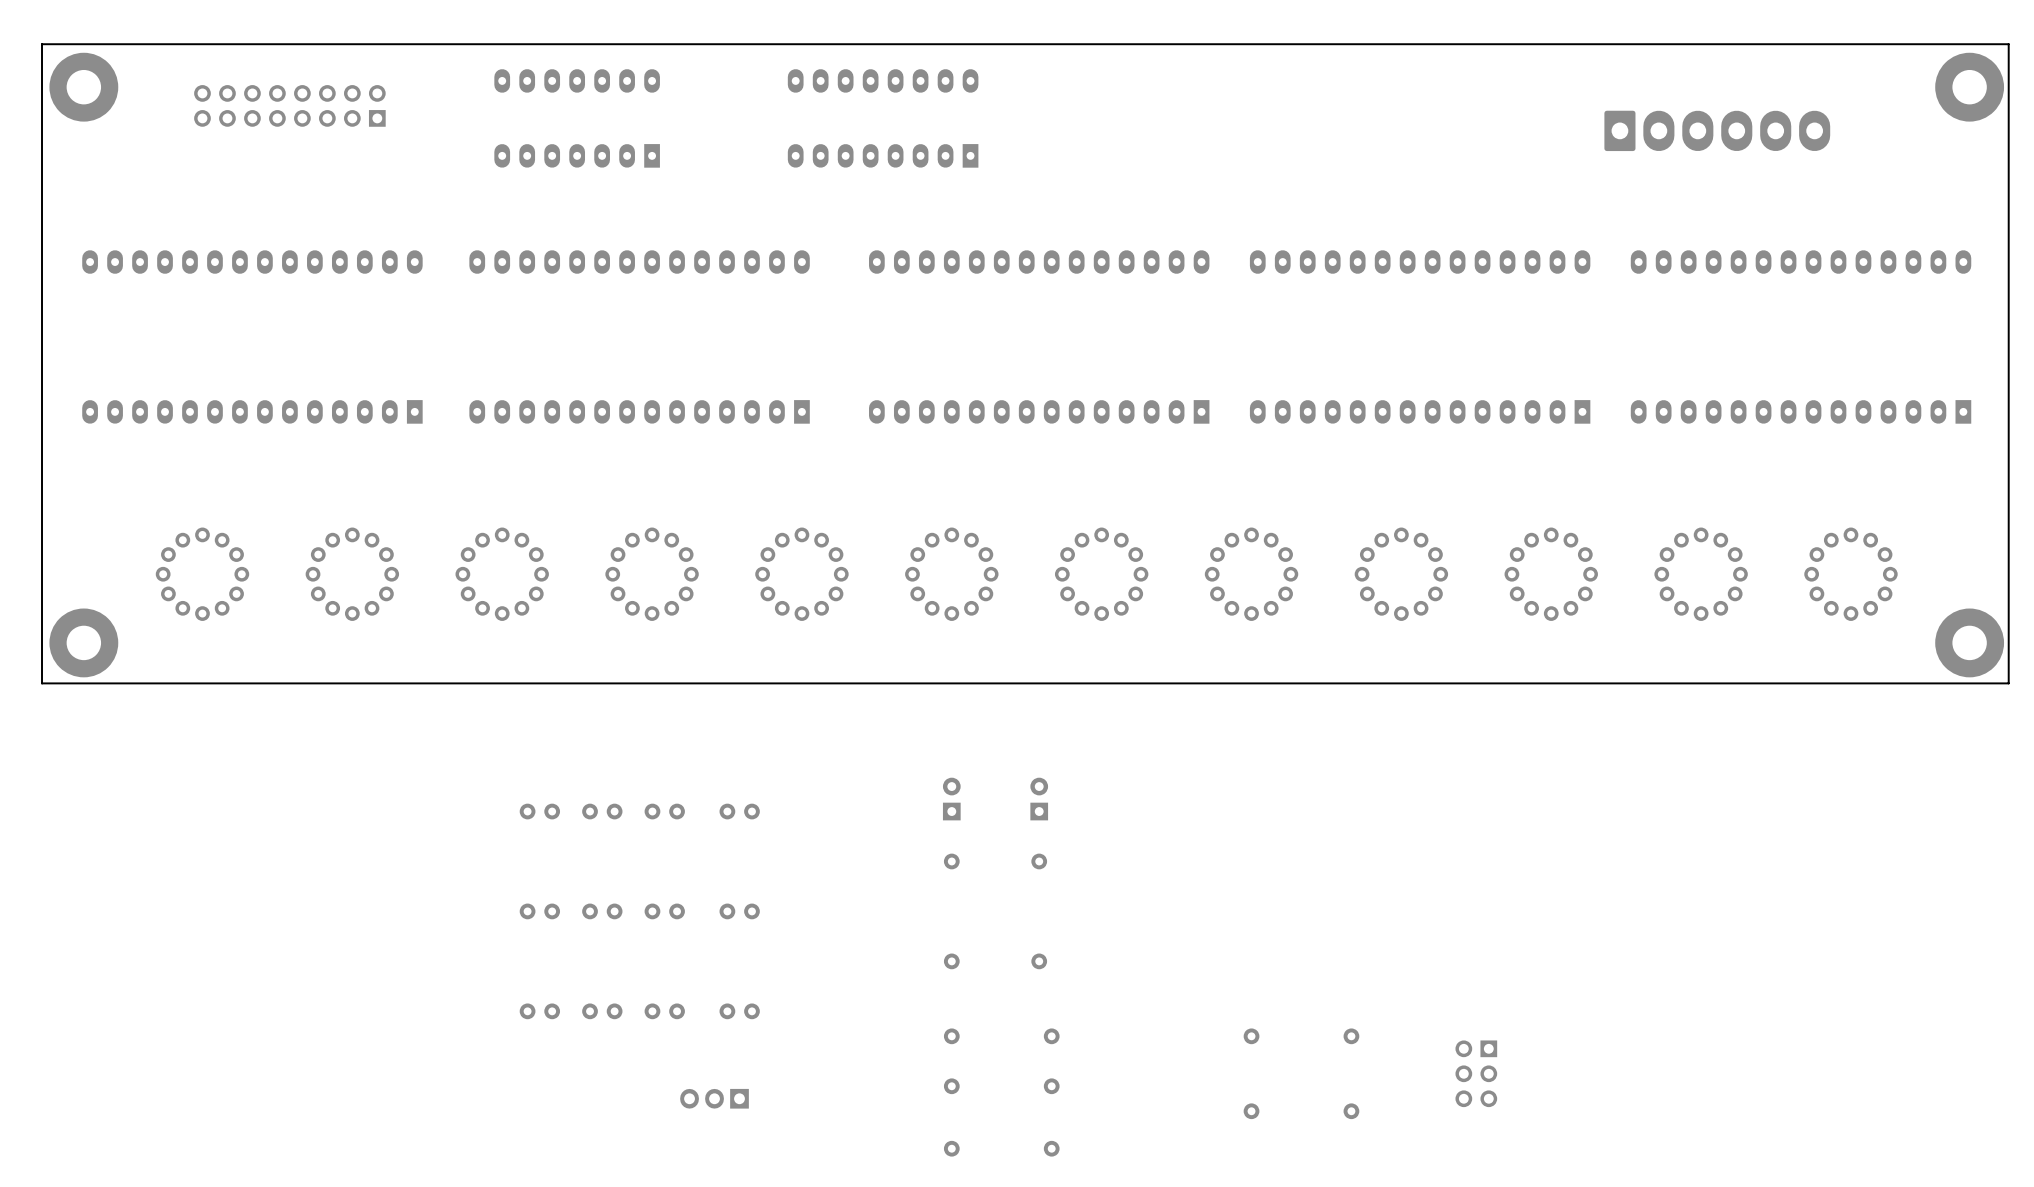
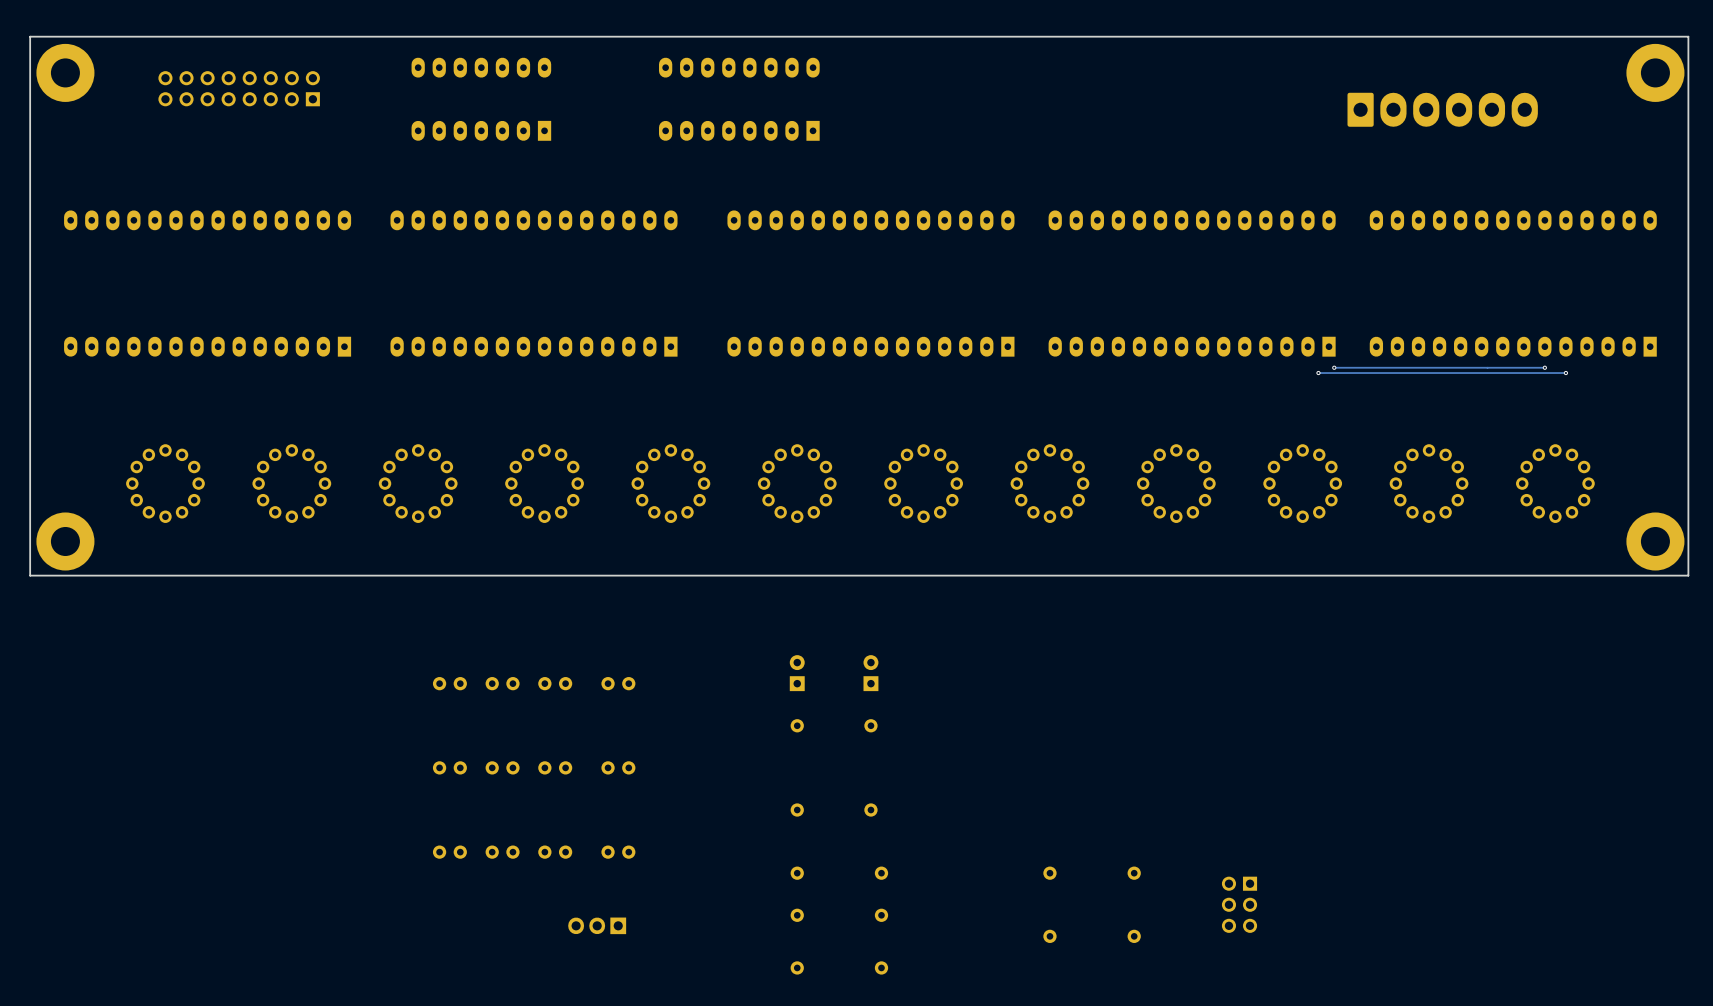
via: none -> (1334, 367)
track: none -> (1544, 367) (1334, 367)
via: none -> (1544, 367)
via: none -> (1318, 373)
track: none -> (1565, 373) (1318, 373)
via: none -> (1565, 373)

